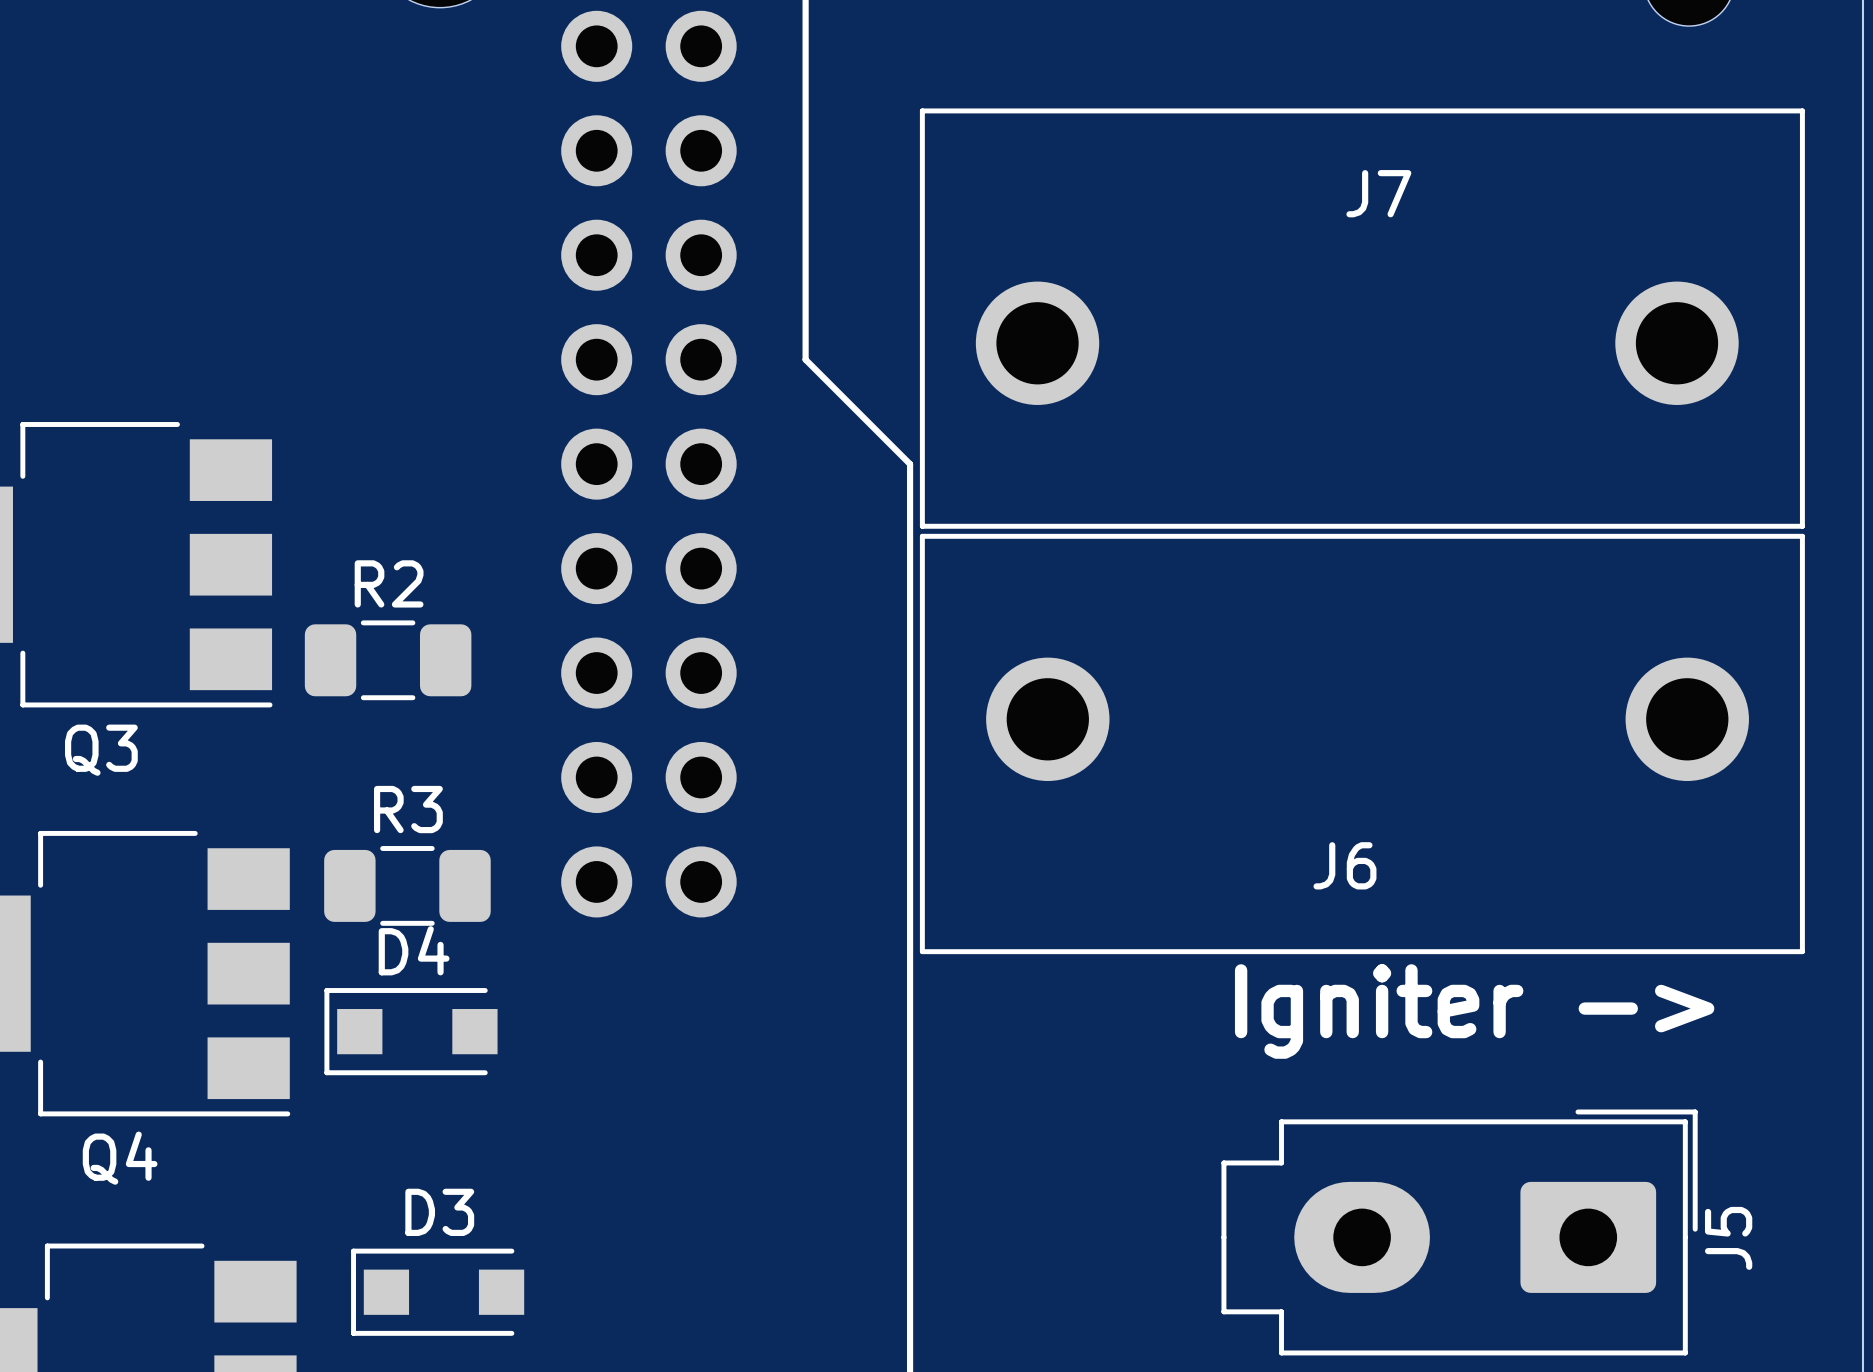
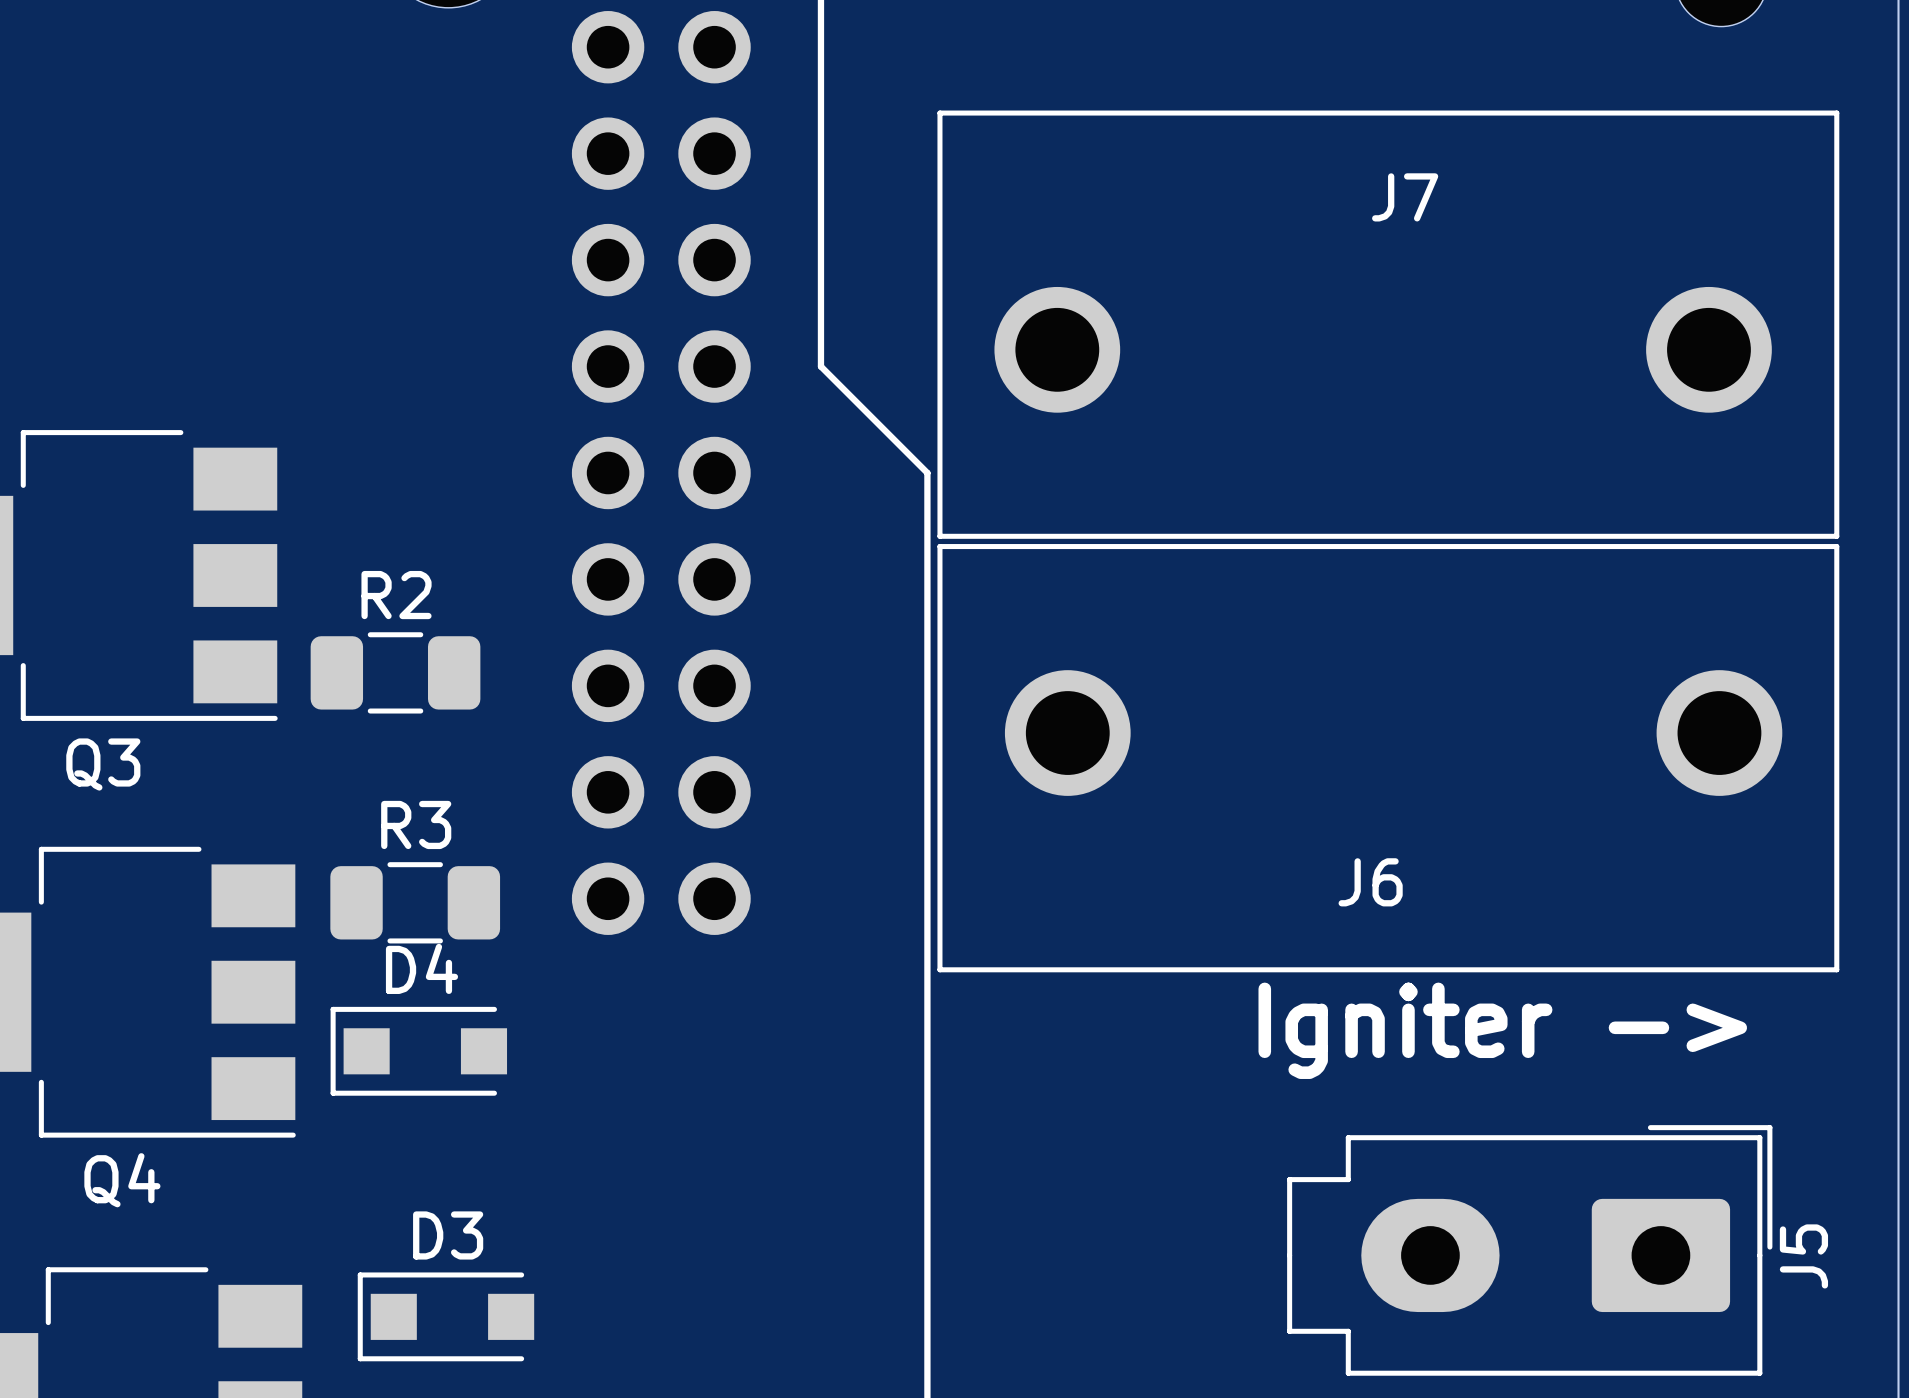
J5 position: (1459, 1232) -> (1529, 1250)

